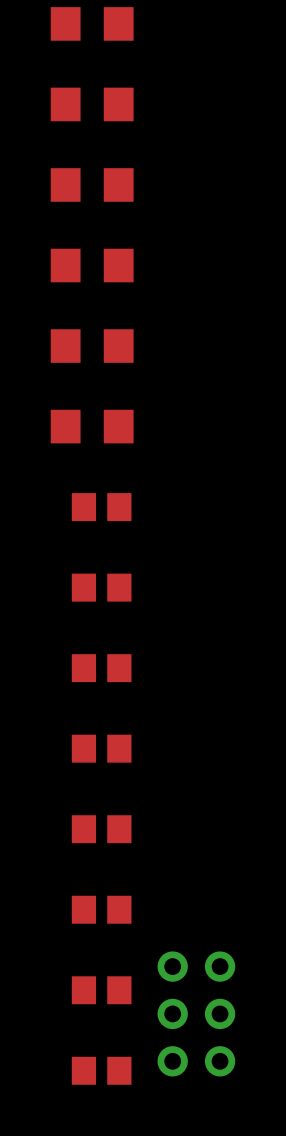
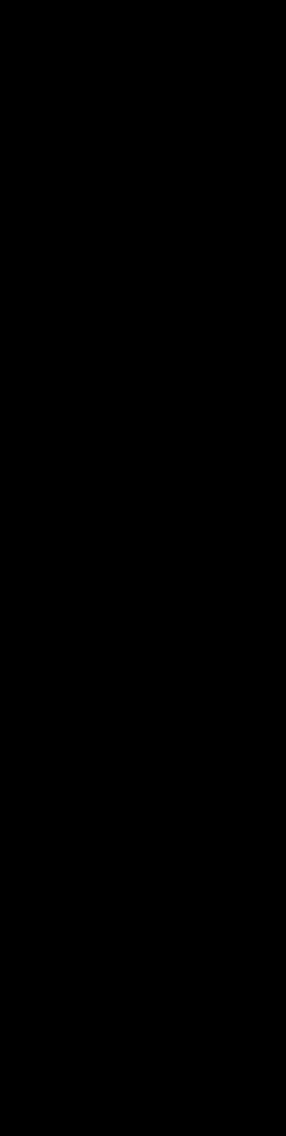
part: (92, 23) -> none
part: (92, 104) -> none
part: (92, 184) -> none
part: (92, 265) -> none
part: (92, 346) -> none
part: (92, 426) -> none
part: (101, 507) -> none
part: (101, 587) -> none
part: (101, 668) -> none
part: (101, 748) -> none
part: (101, 829) -> none
part: (101, 909) -> none
part: (101, 990) -> none
part: (196, 1013) -> none
part: (101, 1070) -> none

